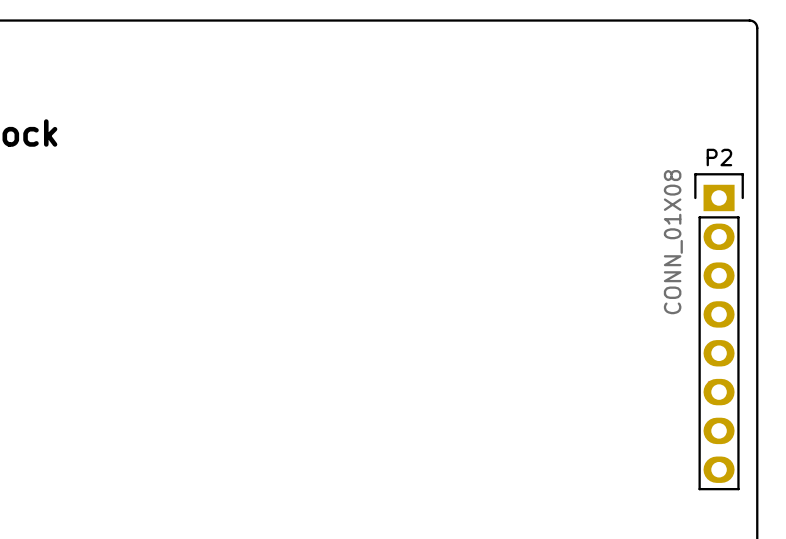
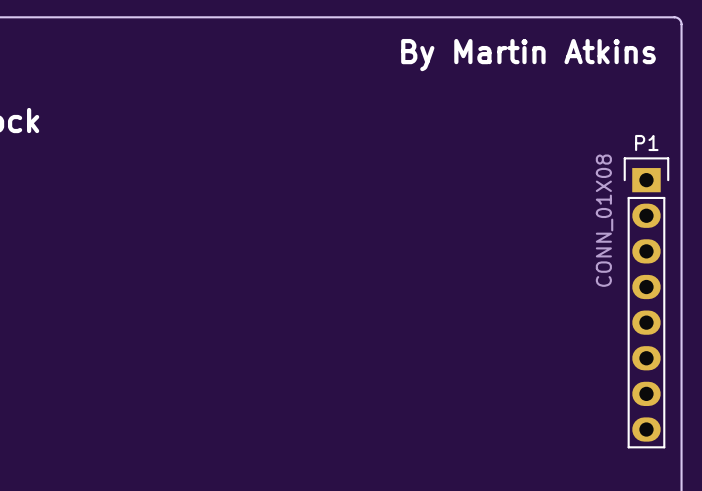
text: none -> By Martin Atkins (528, 55)
P2 name: P2 (719, 157) -> P1 (646, 143)

